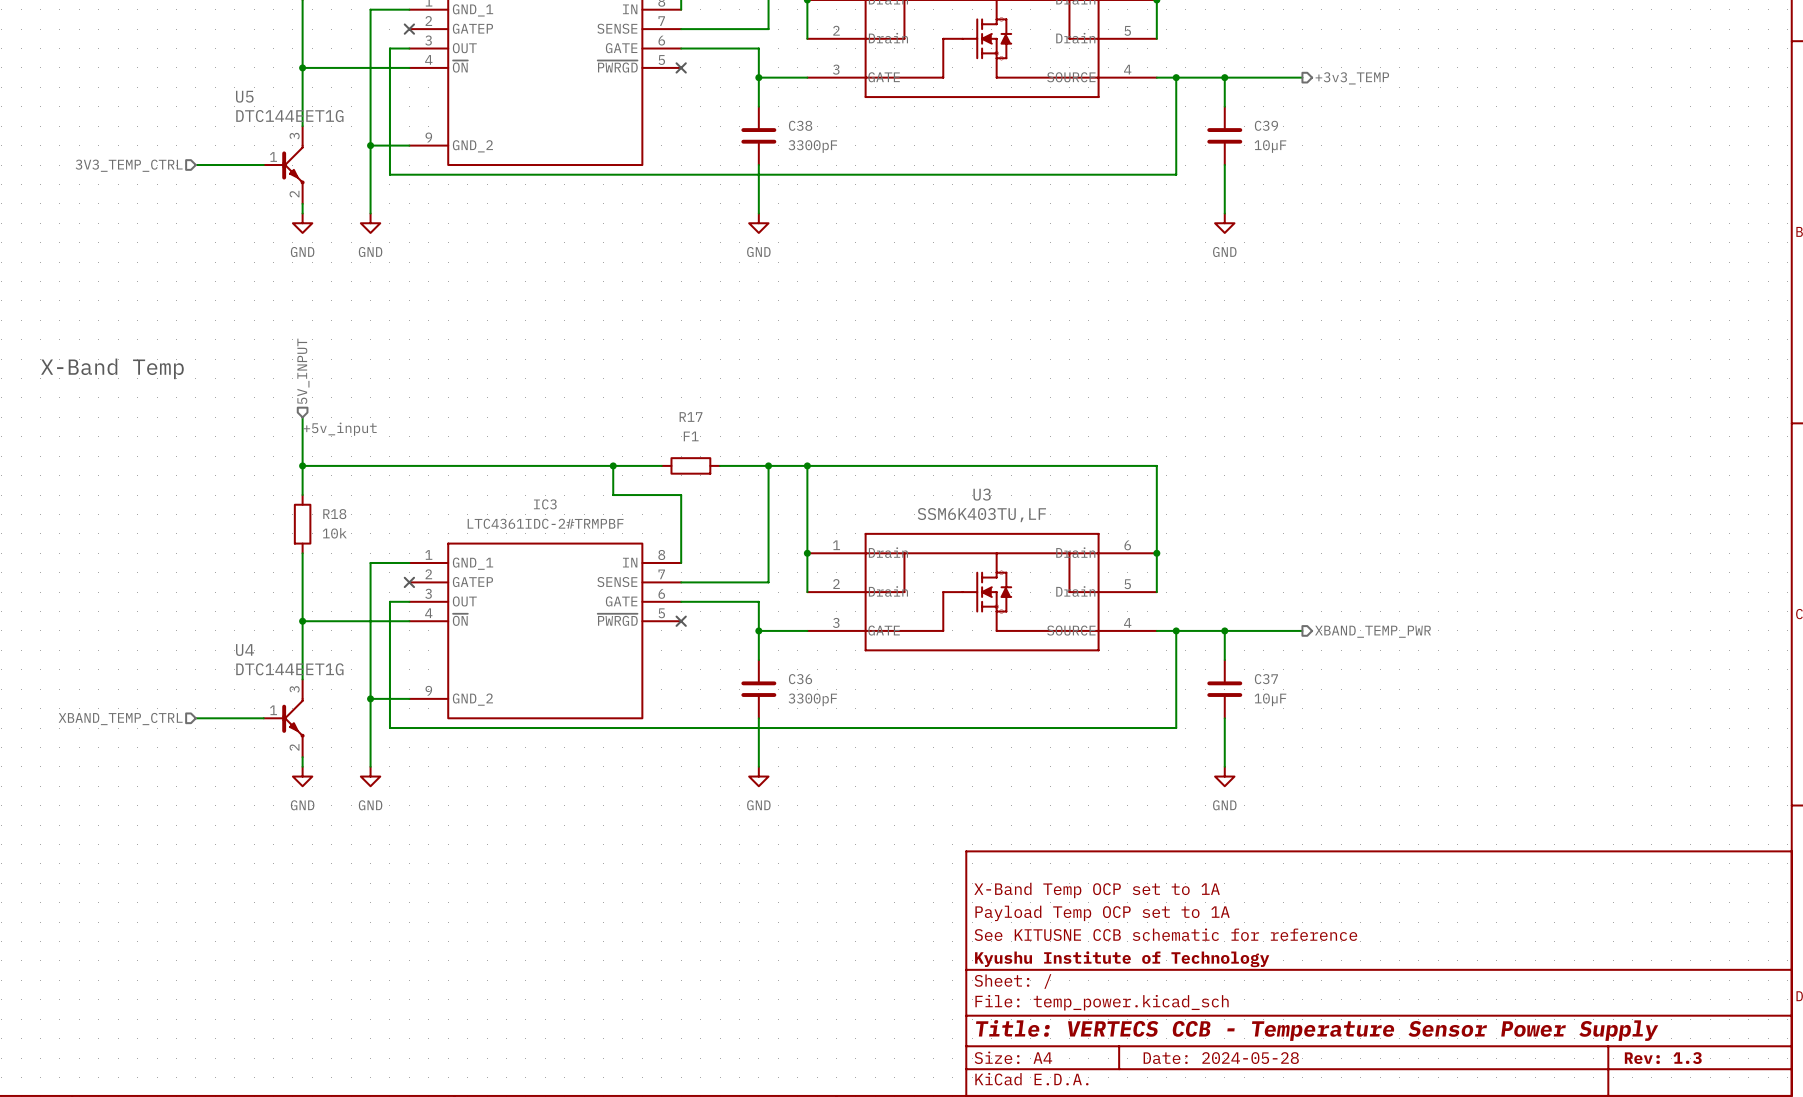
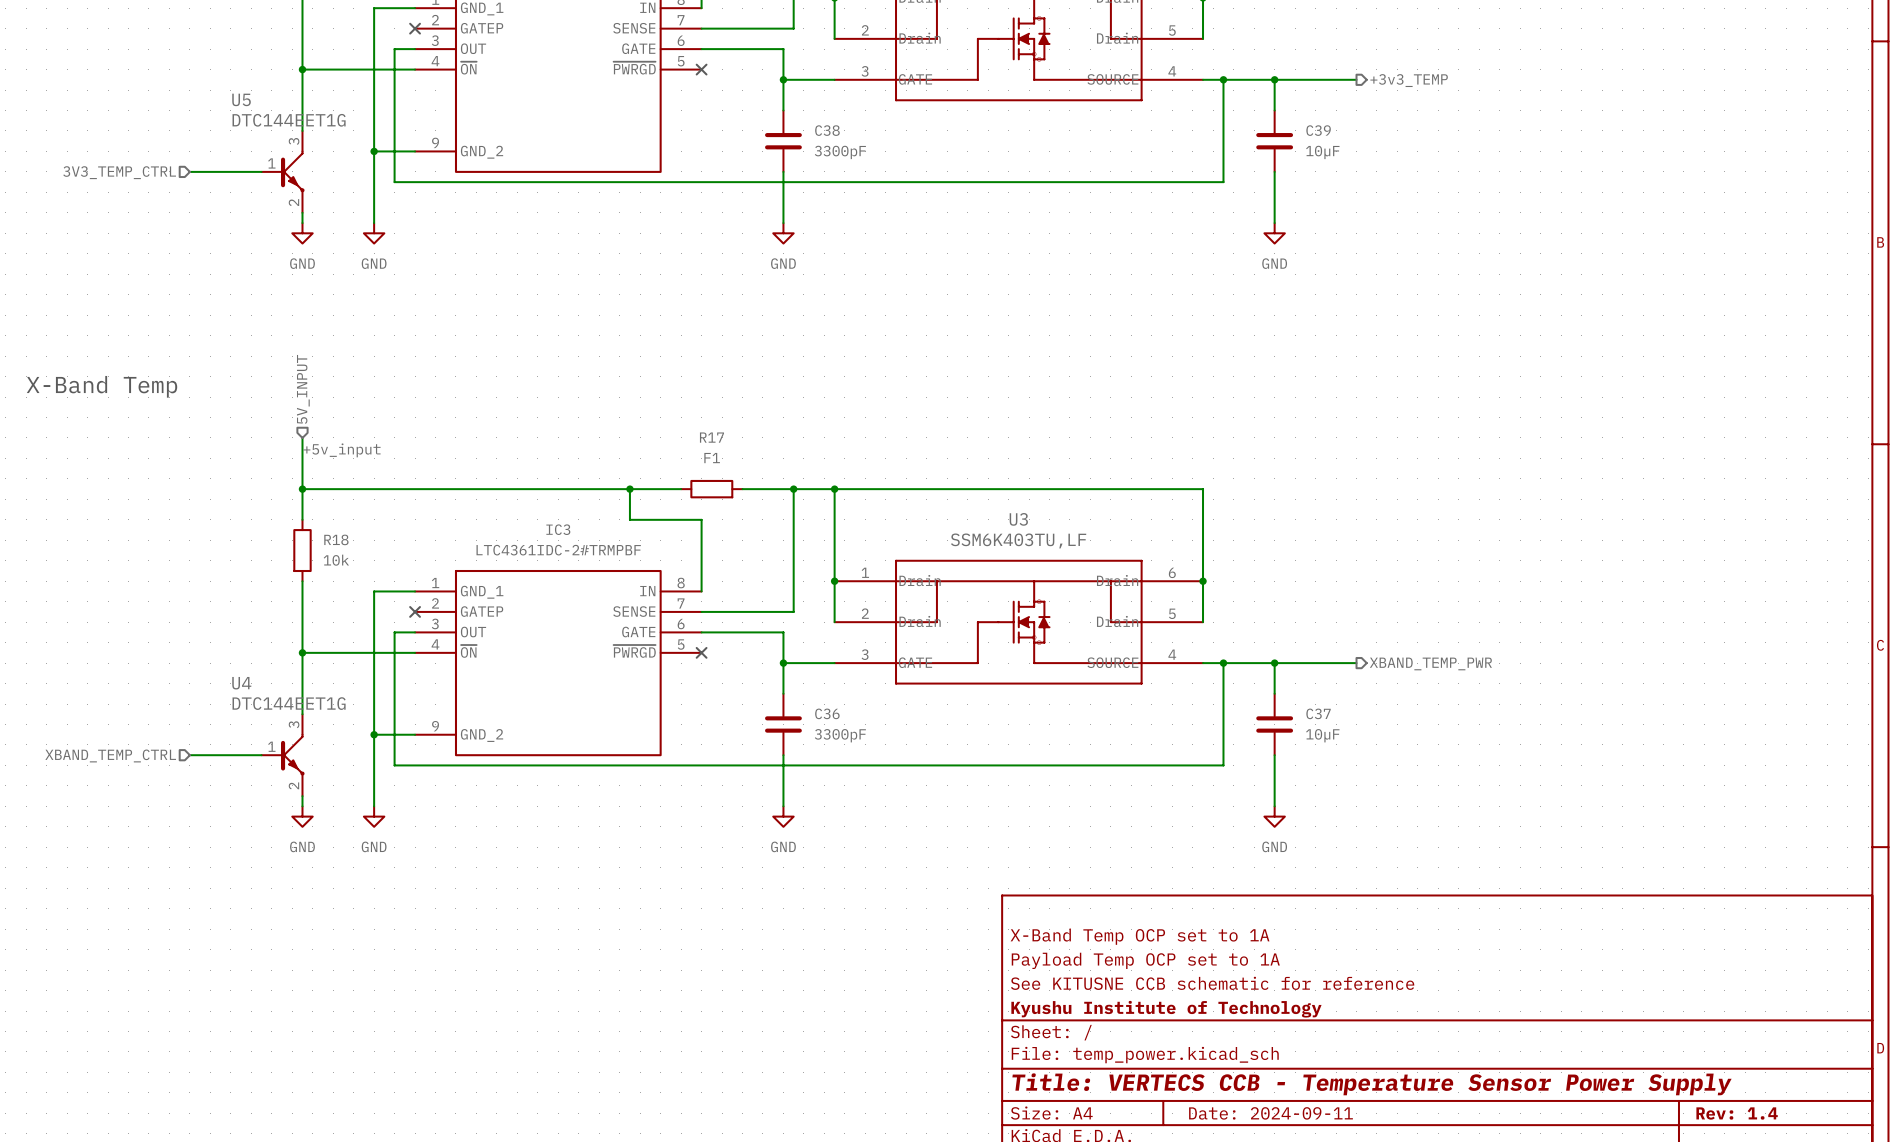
title block: Date: 2024-05-28 (1221, 1058) -> Date: 2024-09-11 (1271, 1113)
title block: Rev: 1.3 (1663, 1058) -> Rev: 1.4 (1737, 1113)

